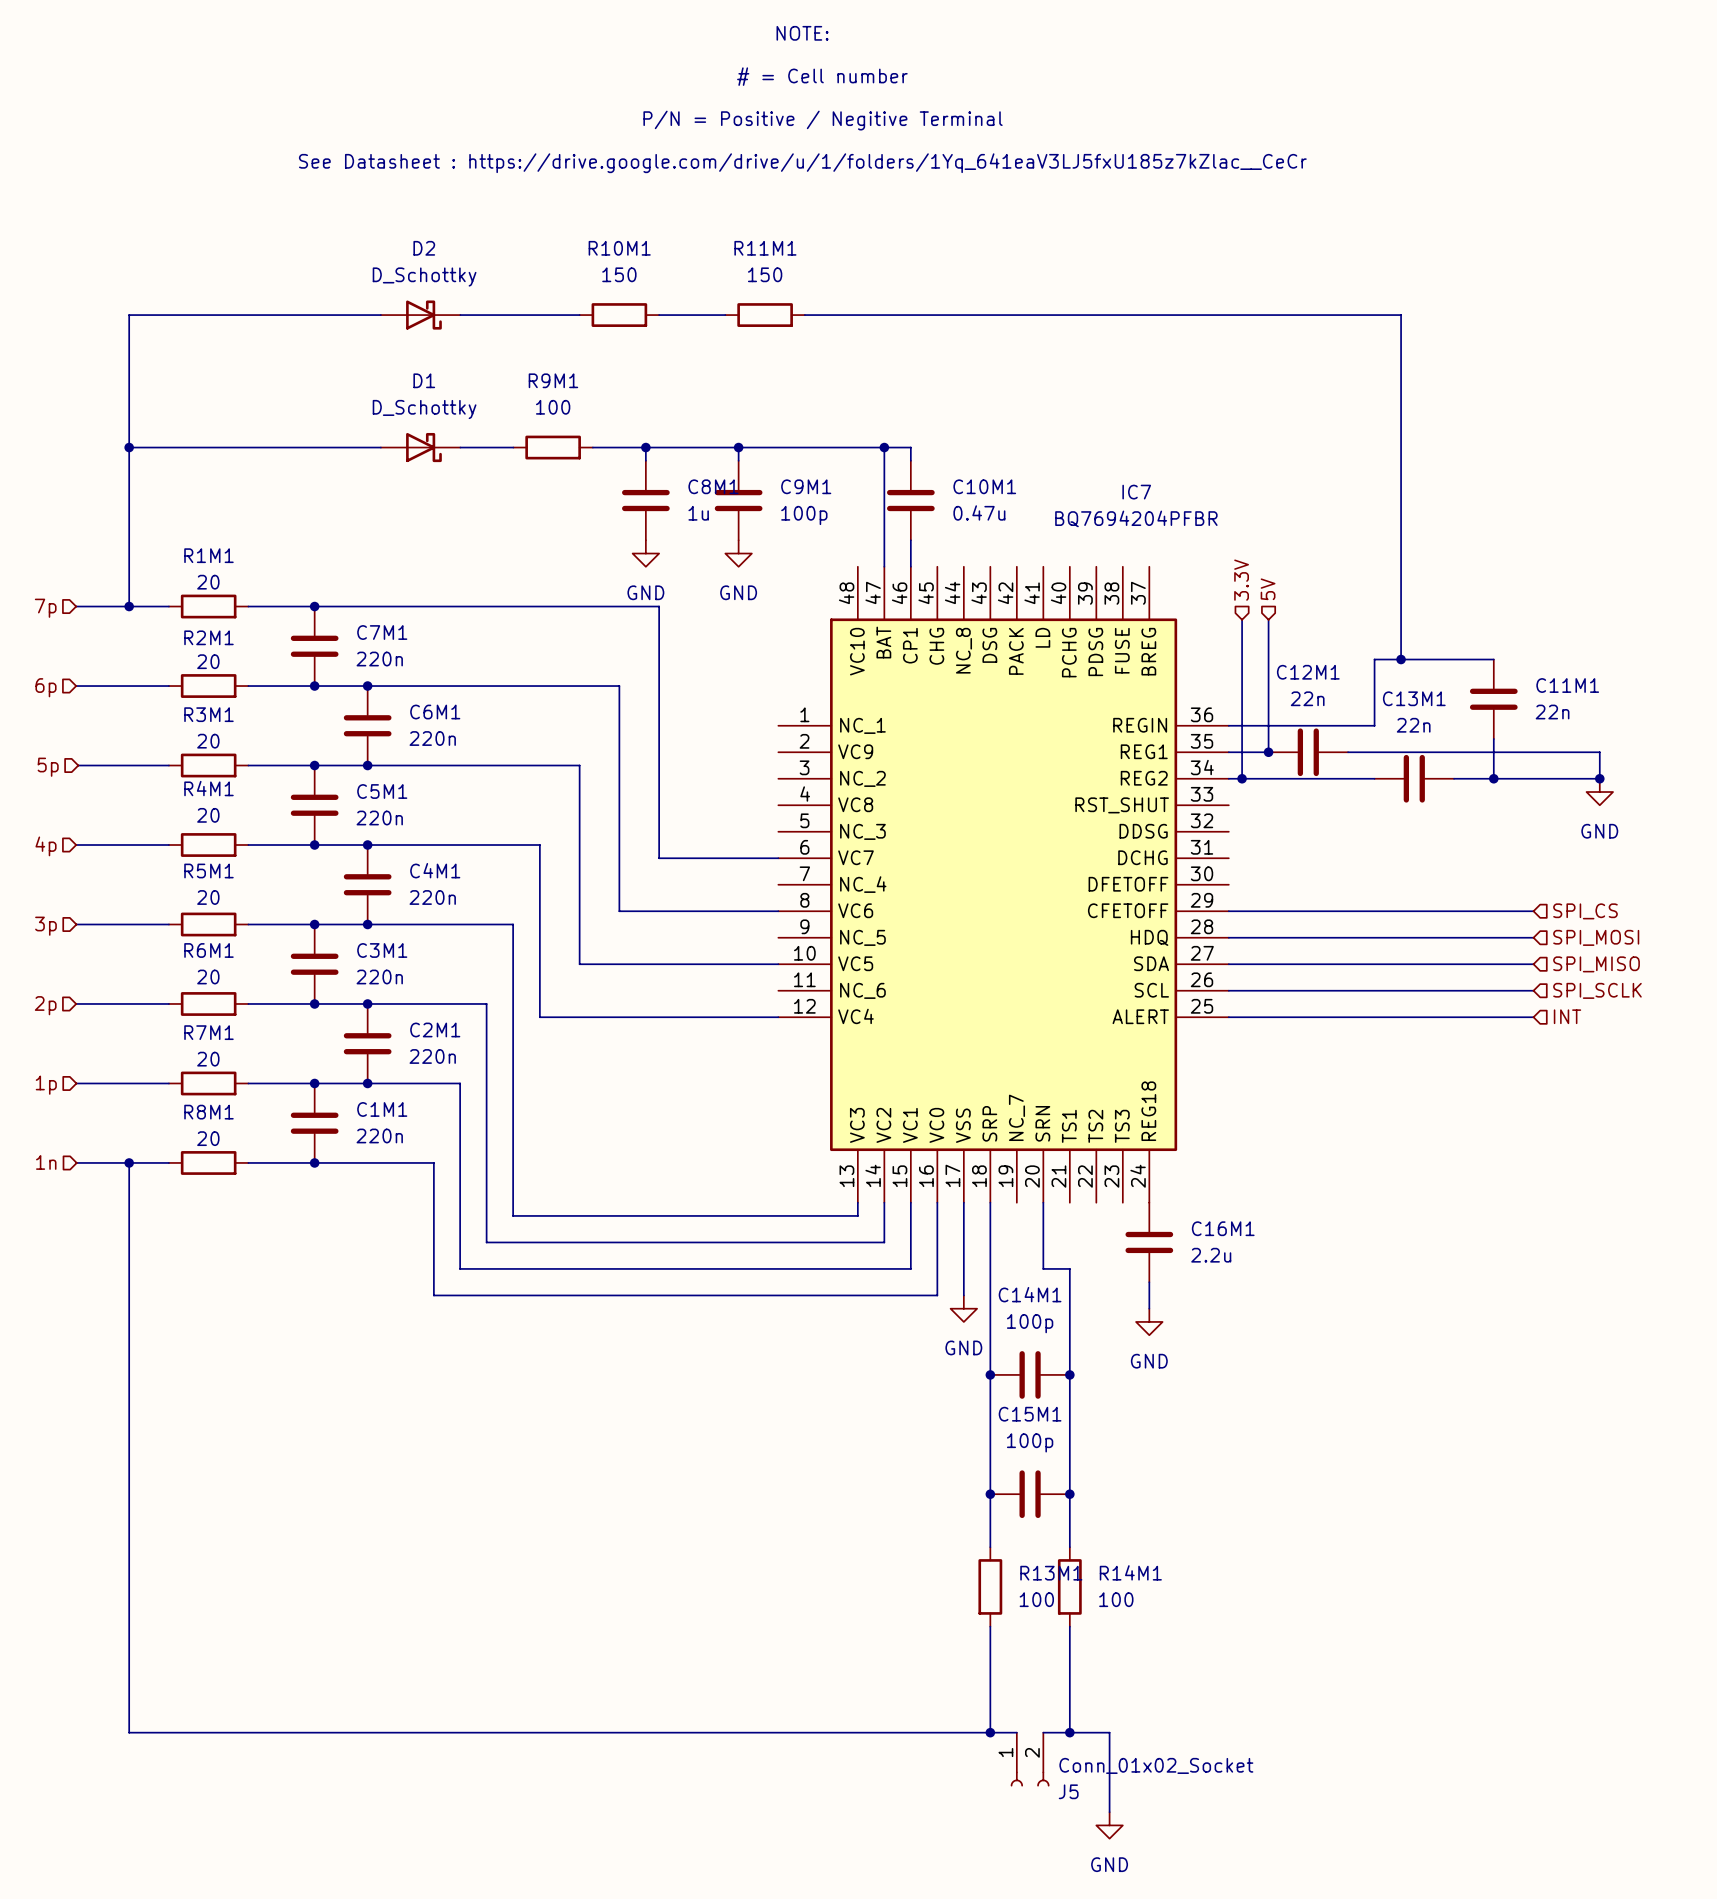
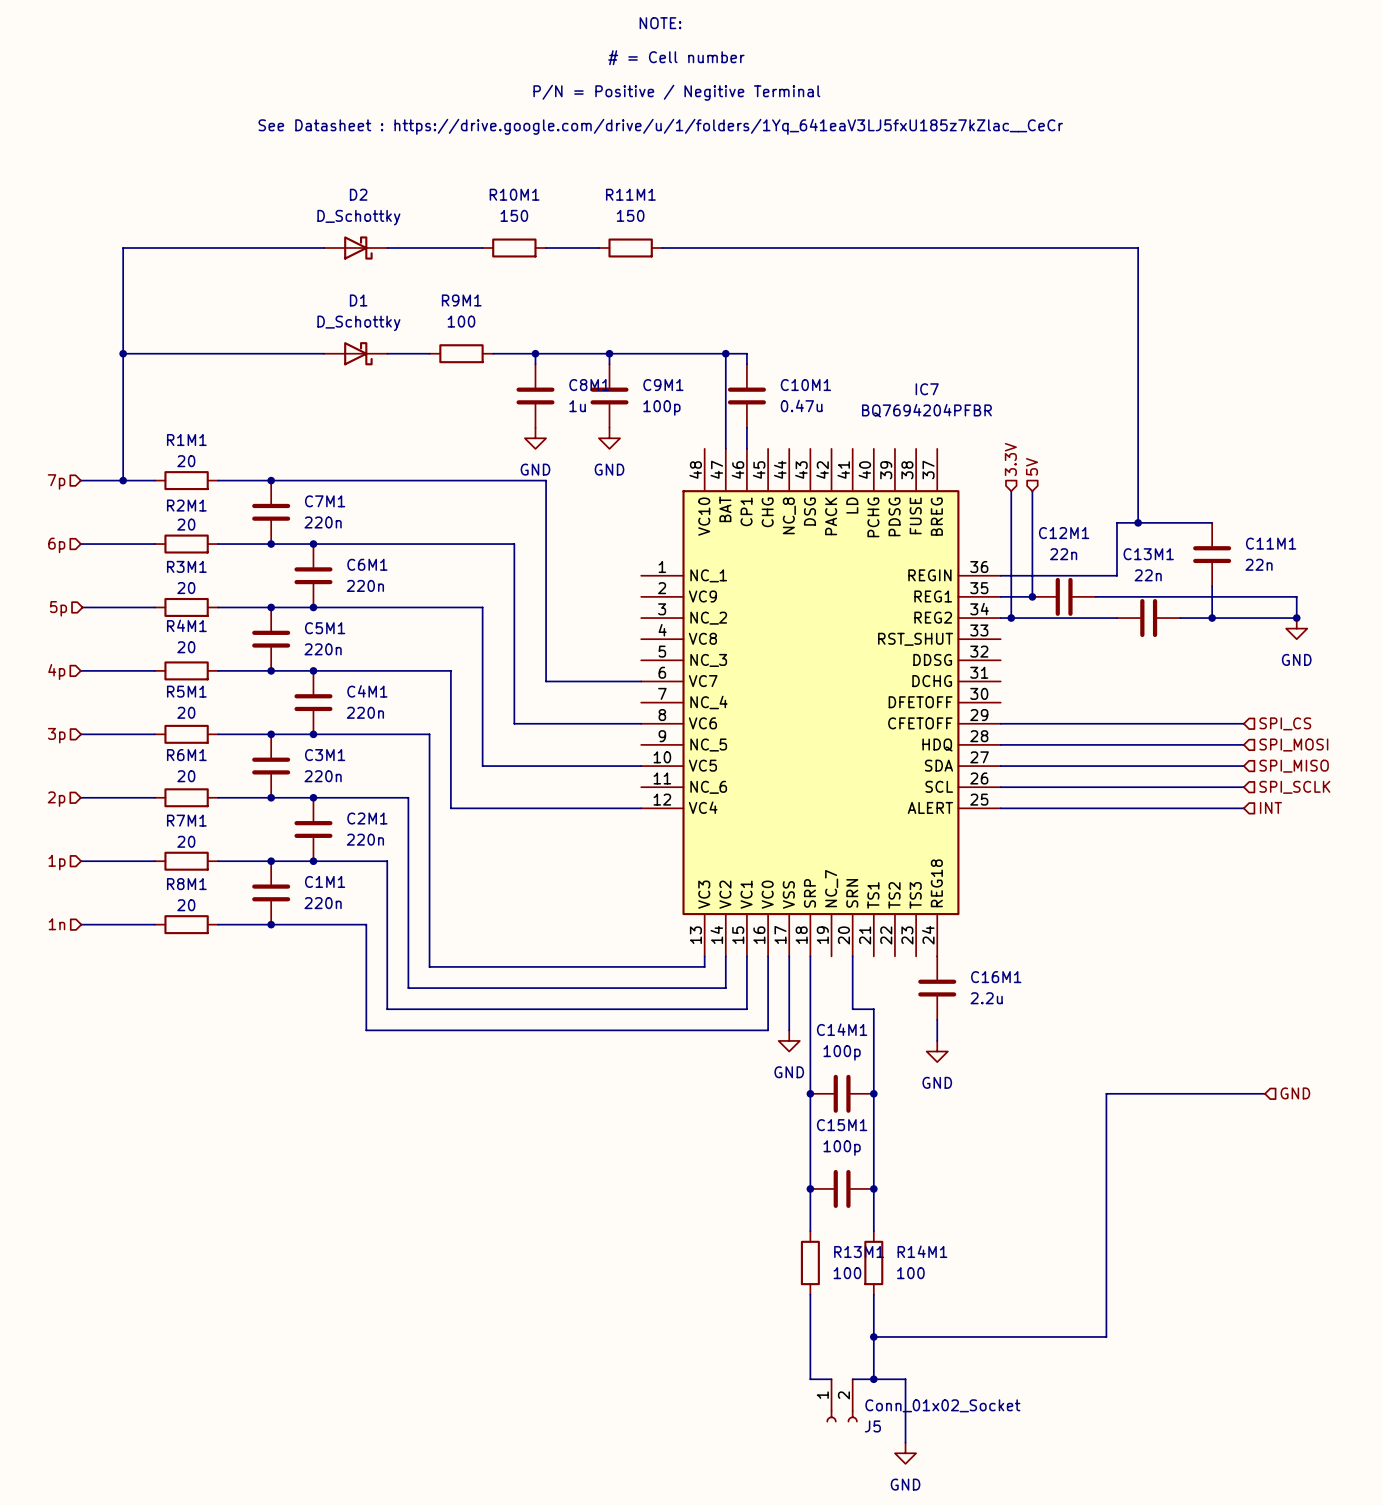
wire: (129, 1162) (129, 1732) (990, 1732) -> none
junction: (129, 1162) -> none
wire: none -> (1265, 1093) (1106, 1093) (1106, 1336) (873, 1336)
hierarchical label: none -> GND (1295, 1093)
junction: none -> (873, 1336)
junction: (990, 1732) -> none

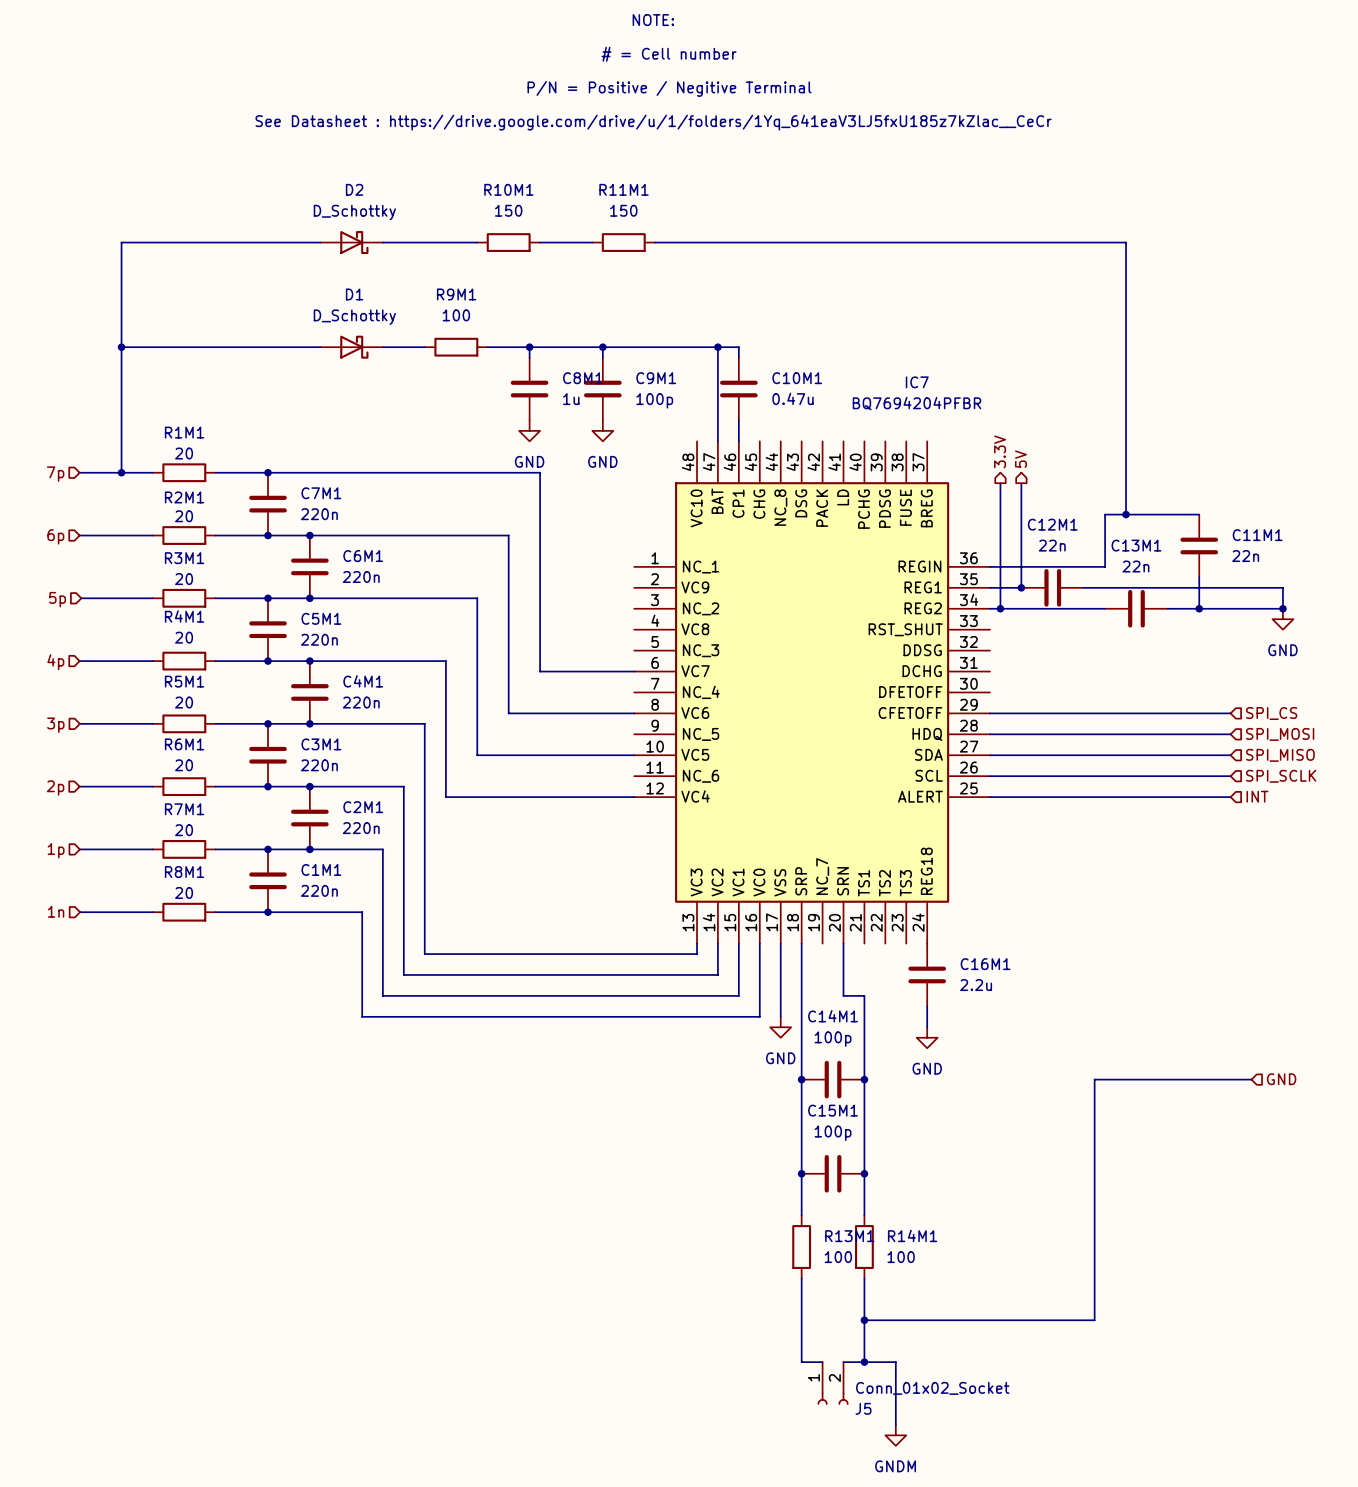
hierarchical label shape: input (1010, 459) -> output (1000, 451)
hierarchical label shape: input (1032, 466) -> output (1020, 459)
power symbol: GND (905, 1453) -> GNDM (895, 1435)

